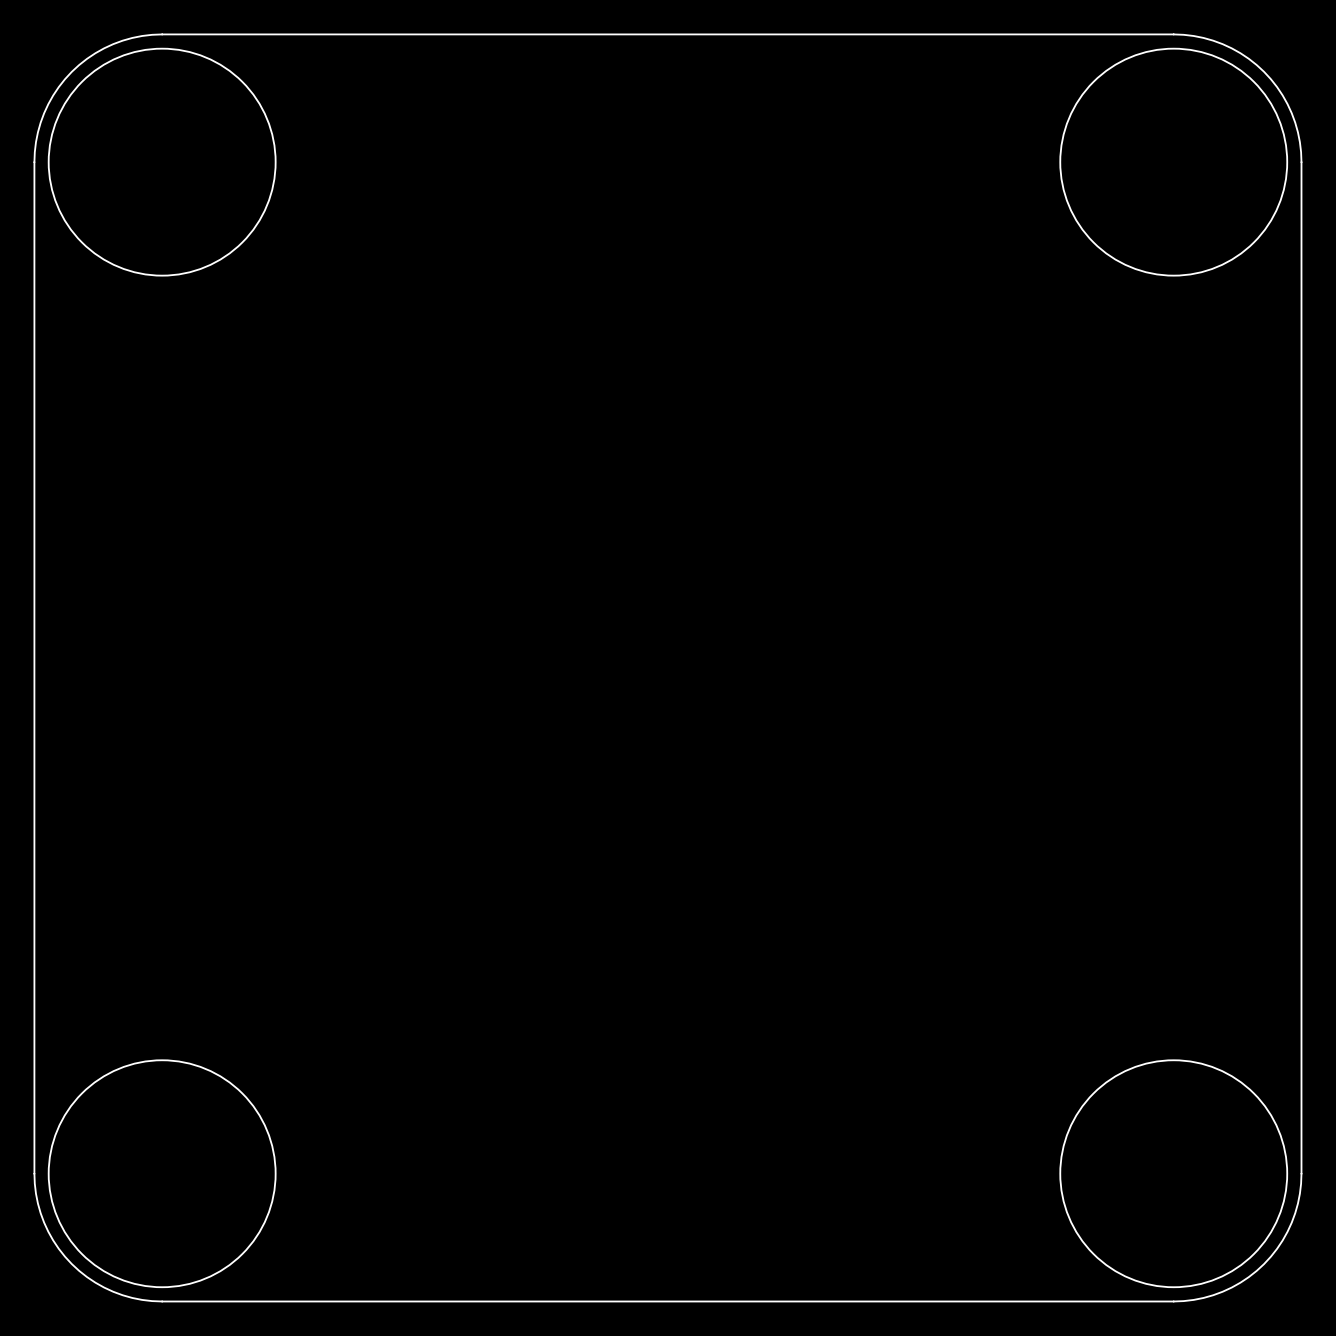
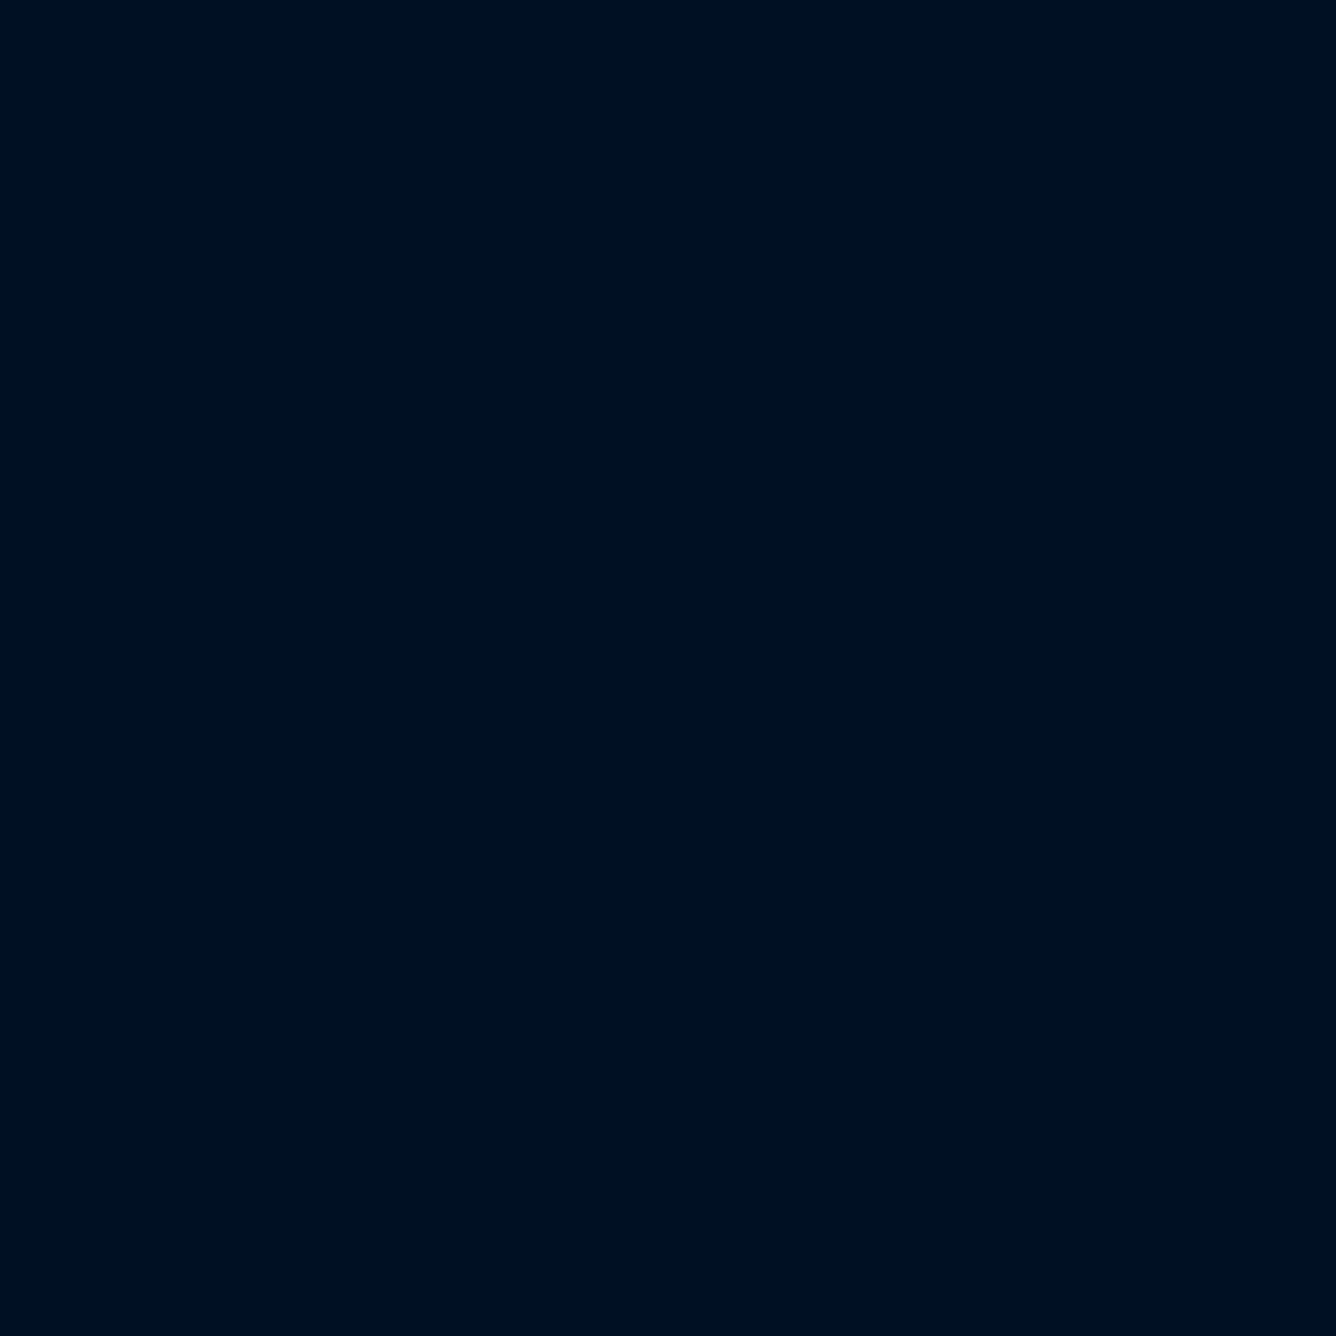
board edge: (162, 34) (1183, 34) (1213, 40) (1231, 48) (1256, 65) (1270, 79) (1282, 95) (1291, 113) (1297, 132) (1301, 162) (1301, 1173) (1299, 1193) (1291, 1222) (1277, 1248) (1256, 1270) (1240, 1282) (1222, 1291) (1203, 1297) (1173, 1301) (162, 1301) (142, 1299) (113, 1291) (87, 1277) (65, 1256) (53, 1240) (44, 1222) (37, 1203) (34, 1173) (34, 152) (37, 132) (44, 113) (53, 95) (71, 71) (87, 58) (113, 44) (132, 37) (162, 34) -> none
round board edge: [48, 48, 277, 277] -> none
round board edge: [1059, 48, 1288, 277] -> none
round board edge: [48, 1059, 277, 1288] -> none
round board edge: [1059, 1059, 1288, 1288] -> none

